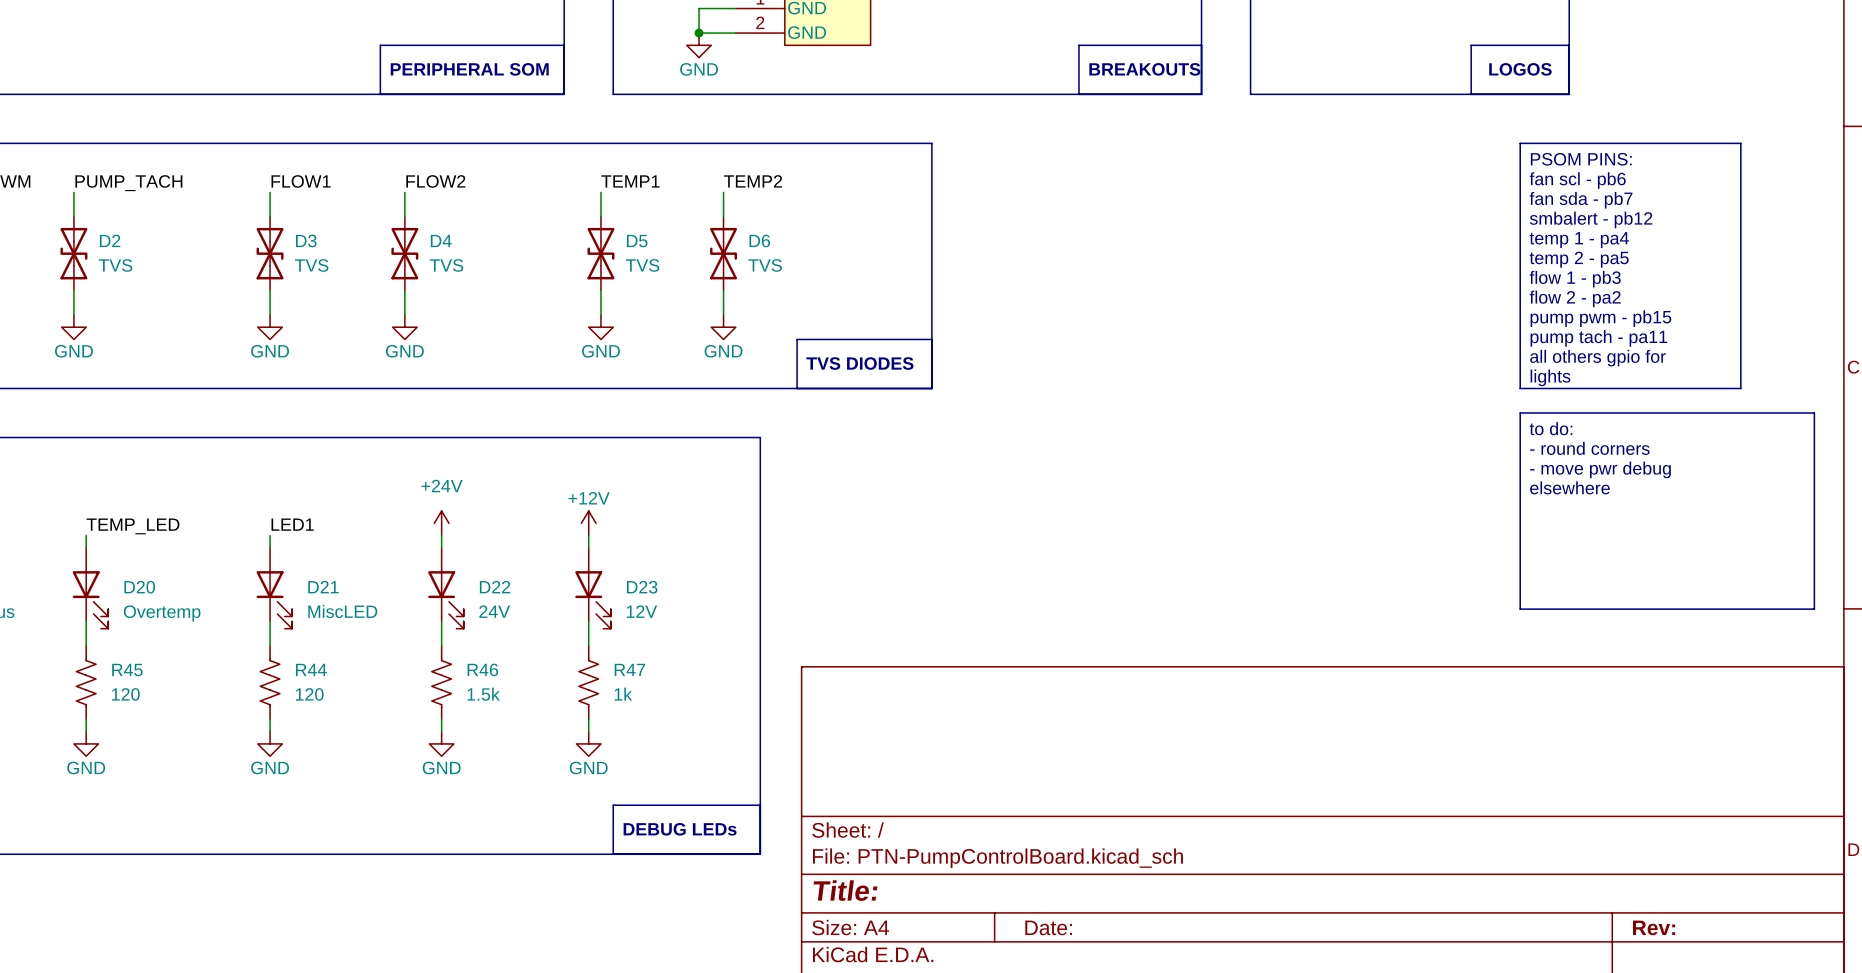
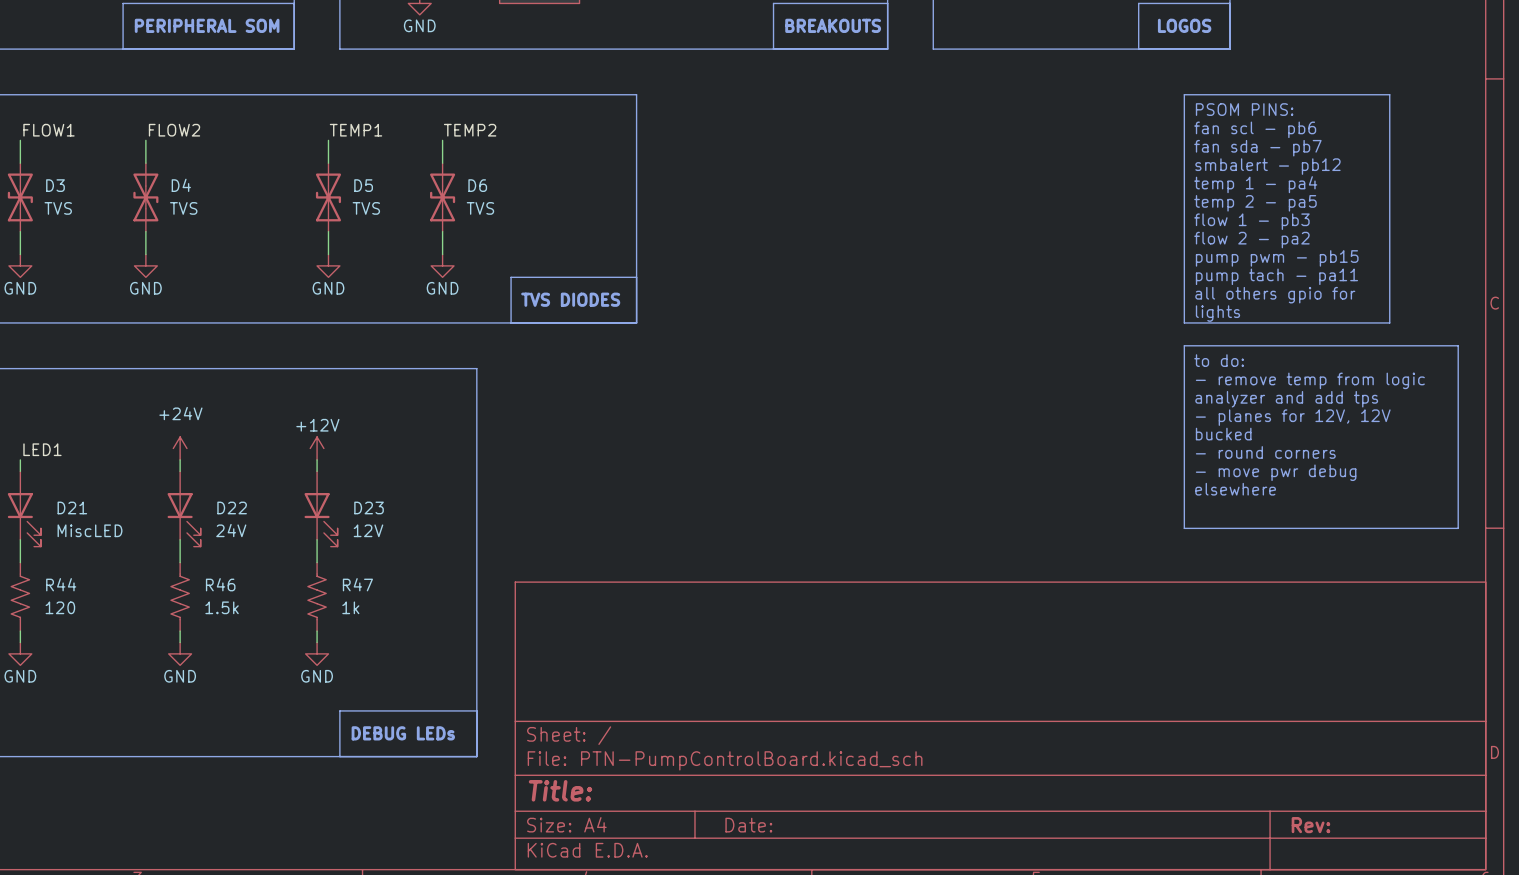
text: - round corners (1589, 448) -> - remove temp from logic (1310, 380)
text: - move pwr debug (1600, 469) -> analyzer and add tps (1286, 399)
text: elsewhere (1569, 487) -> - planes for 12V, 12V (1293, 417)
text: none -> bucked (1223, 434)
text: none -> - round corners (1265, 452)
text: none -> - move pwr debug (1276, 472)
text: none -> elsewhere (1235, 489)

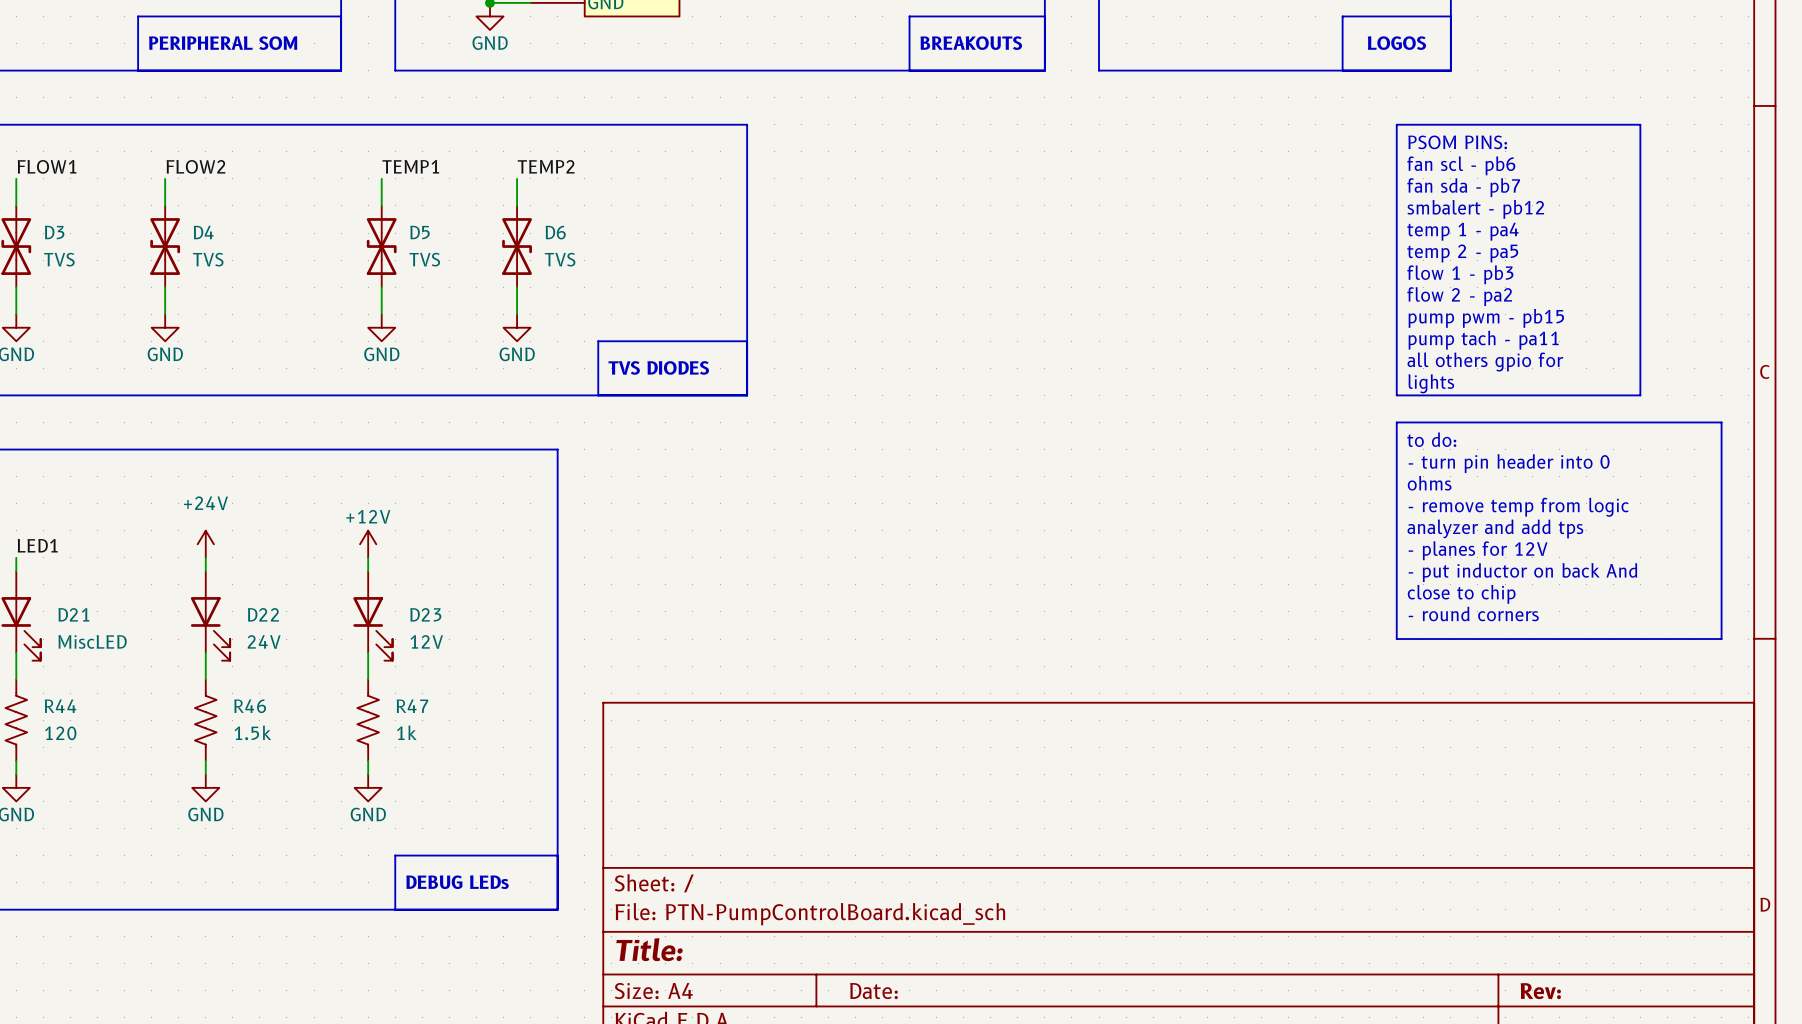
text: - remove temp from logic (1310, 380) -> - turn pin header into 0 (1509, 463)
text: analyzer and add tps (1286, 399) -> ohms (1429, 483)
text: - planes for 12V, 12V (1293, 417) -> - remove temp from logic (1518, 507)
text: bucked (1223, 434) -> analyzer and add tps (1495, 528)
text: - round corners (1265, 452) -> - planes for 12V (1478, 550)
text: - move pwr debug (1276, 472) -> - put inductor on back And (1522, 572)
text: elsewhere (1235, 489) -> close to chip (1461, 594)
text: none -> - round corners (1473, 613)

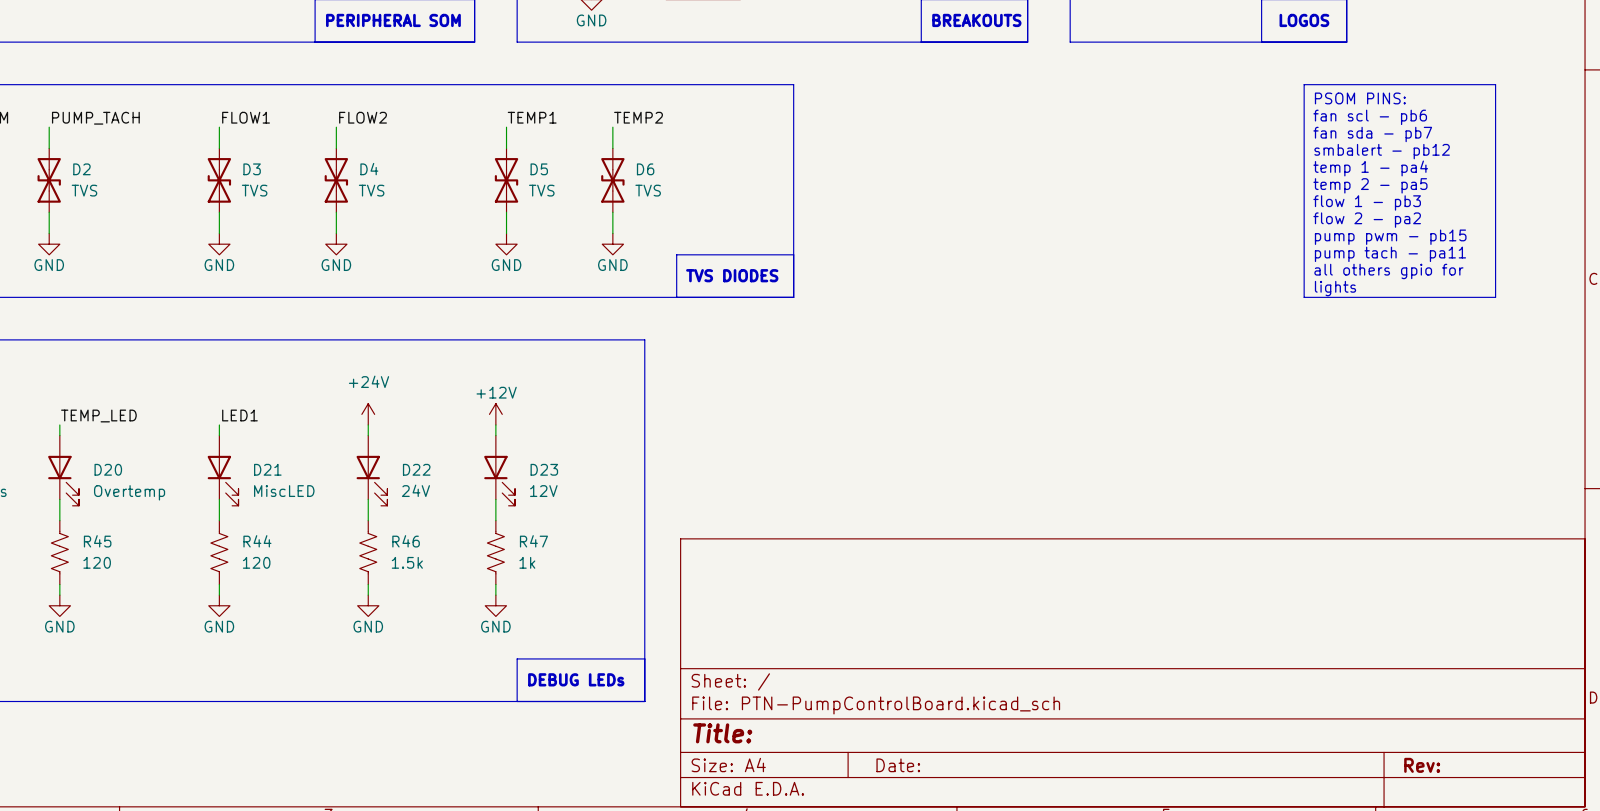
line: (1396, 422) (1721, 422) (1721, 639) (1396, 639) (1396, 422) -> none
text: to do: (1431, 439) -> none
text: - turn pin header into 0 (1509, 463) -> none
text: ohms (1429, 483) -> none
text: - remove temp from logic (1518, 507) -> none
text: analyzer and add tps (1495, 528) -> none
text: - planes for 12V (1478, 550) -> none
text: - put inductor on back And (1522, 572) -> none
text: close to chip (1461, 594) -> none
text: - round corners (1473, 613) -> none

